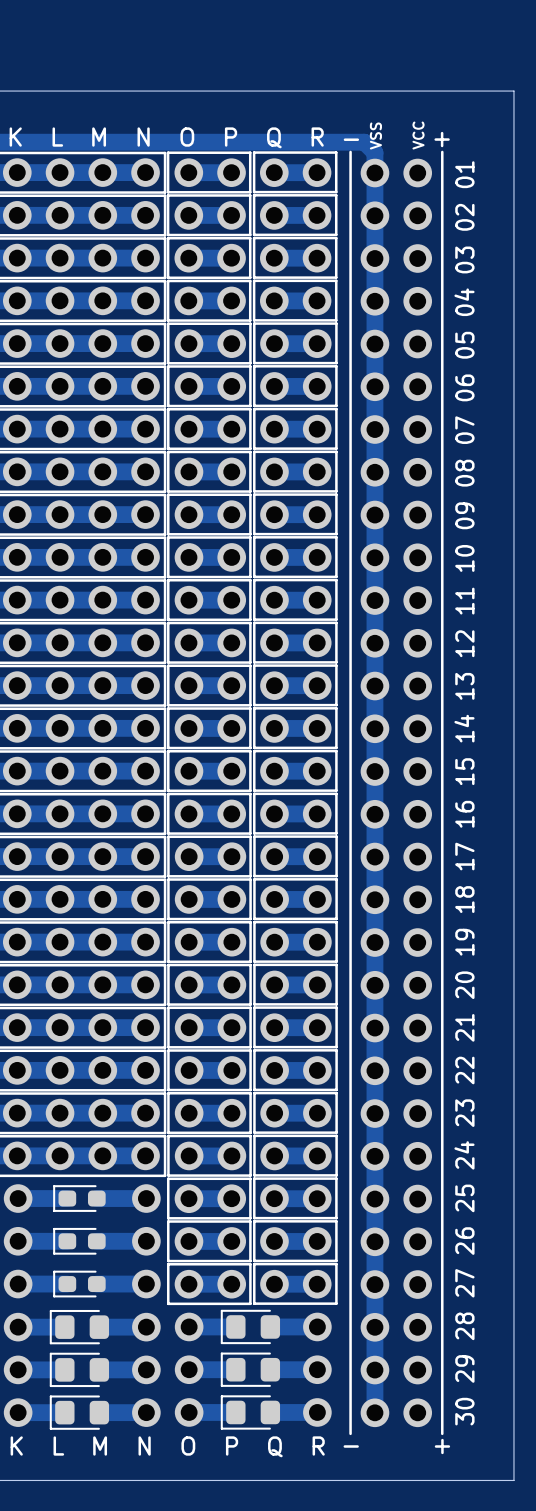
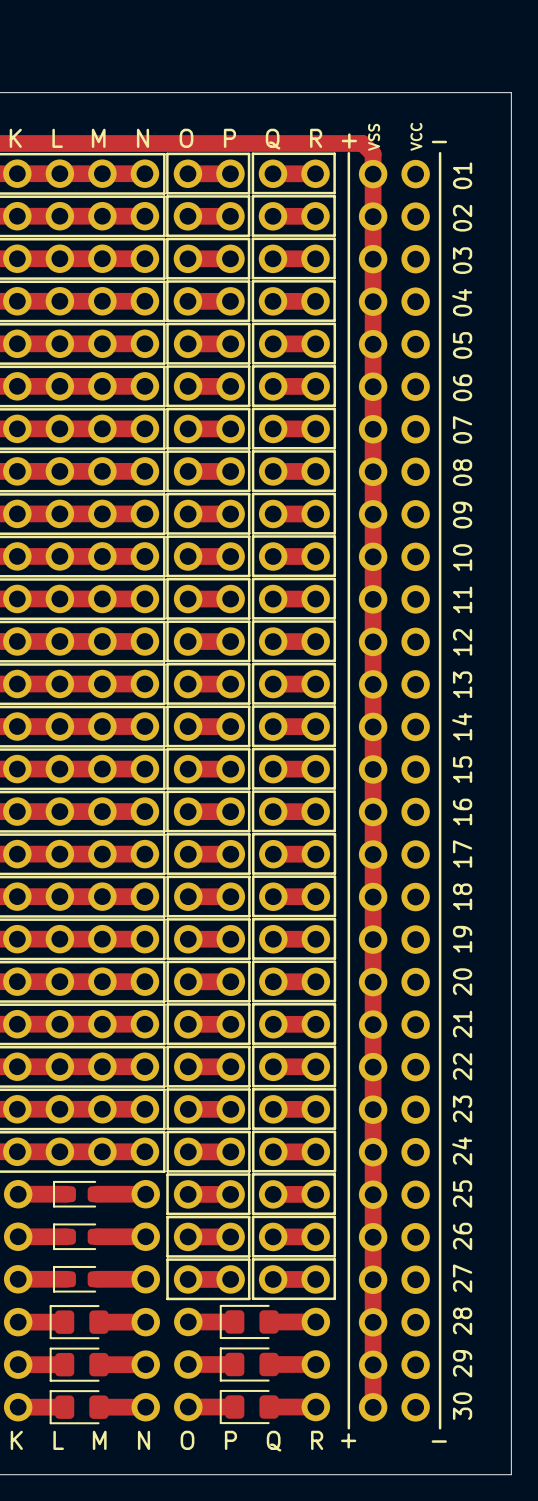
part text: - (351, 139) -> + (349, 140)
part text position: + (442, 139) -> + (348, 1440)
part text: none -> - (439, 142)
part text position: - (351, 1446) -> - (439, 1441)
part text: + (442, 1446) -> none

